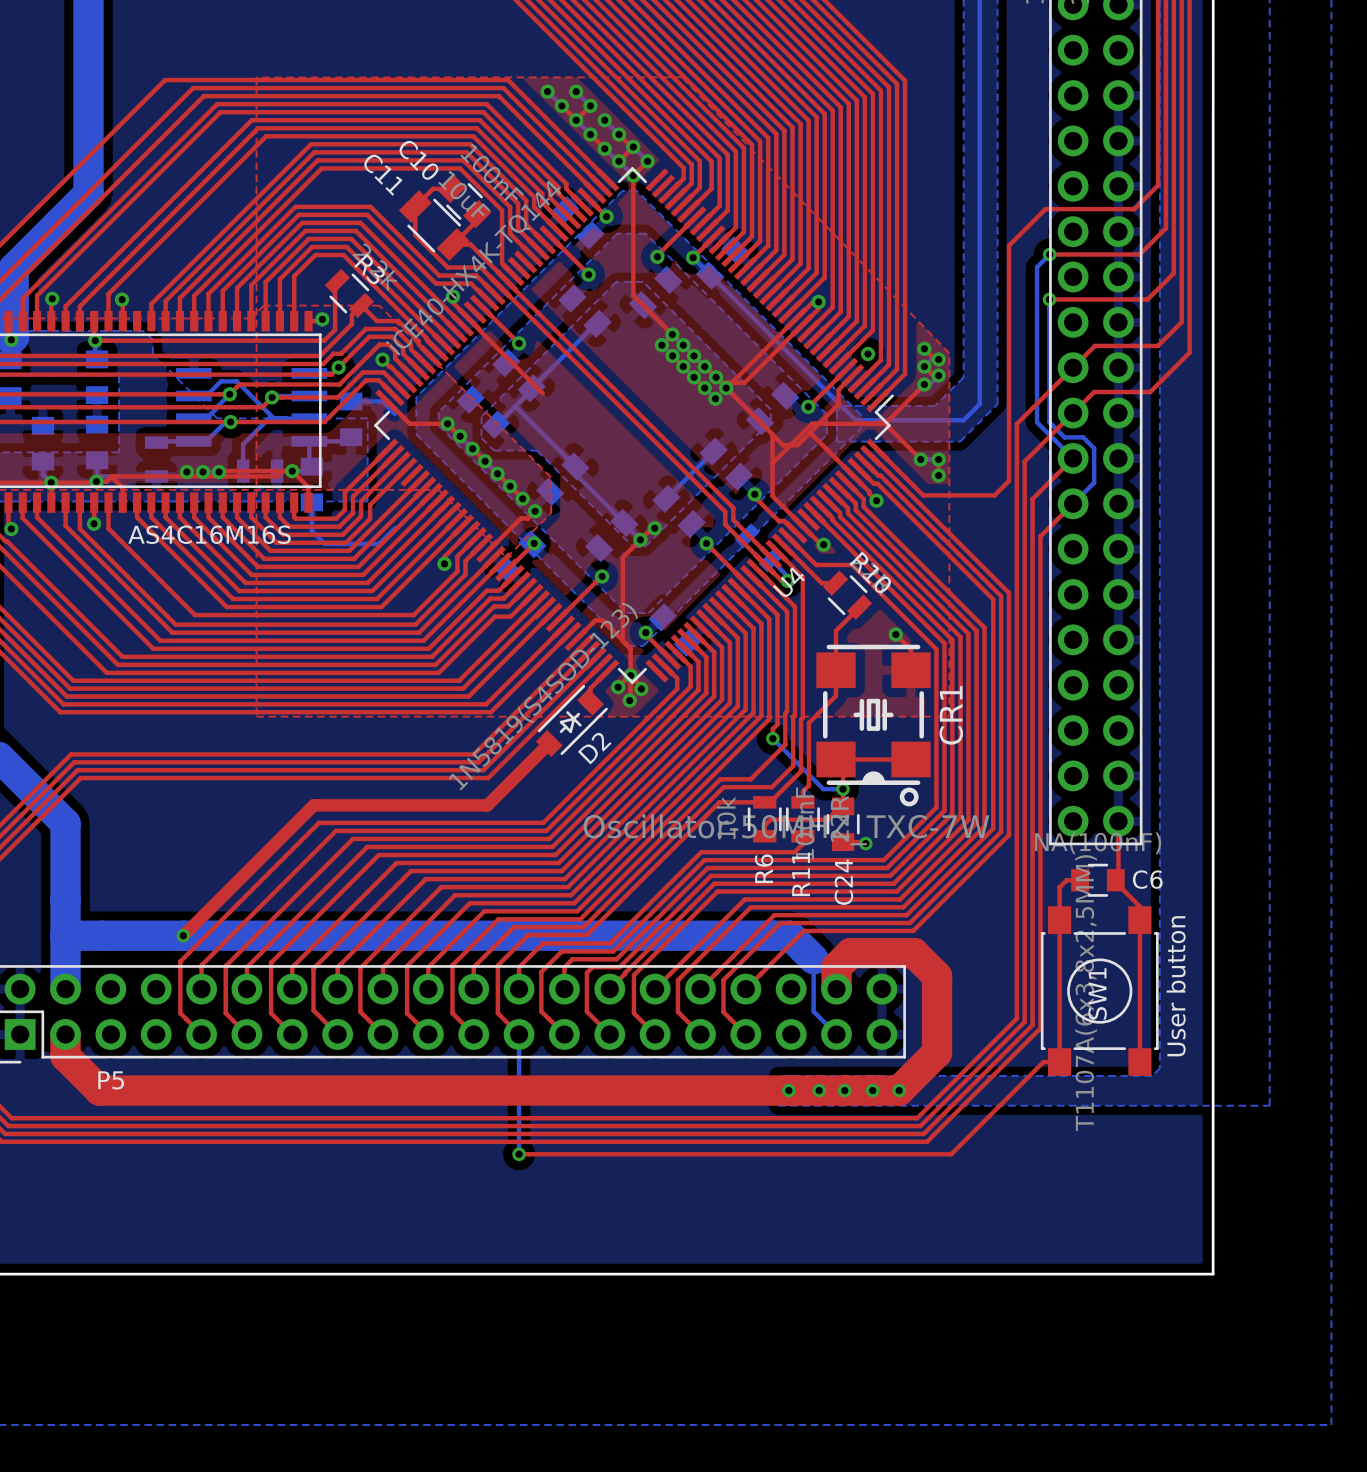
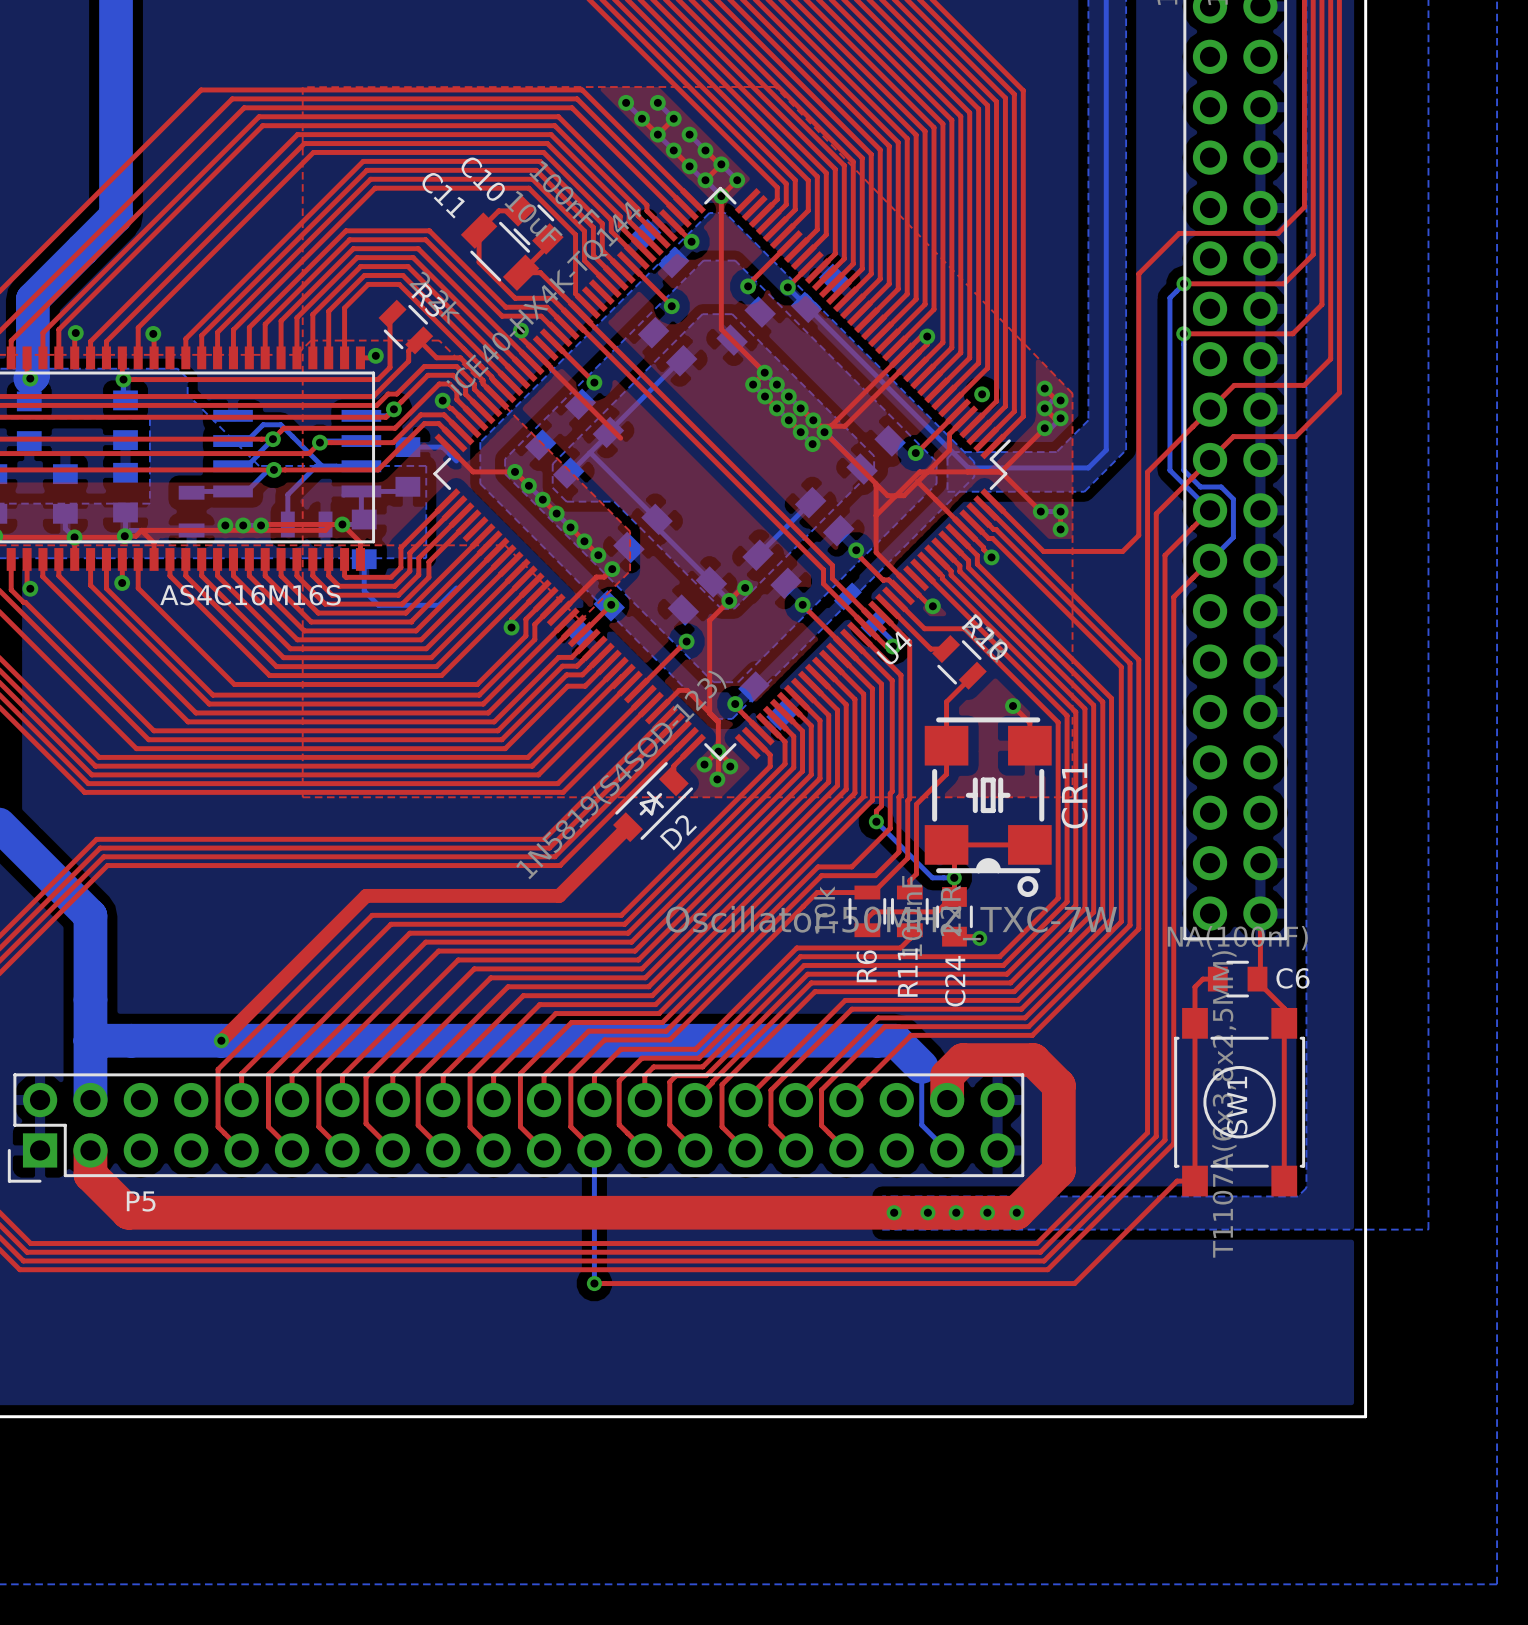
text: User button (1176, 986) -> none

